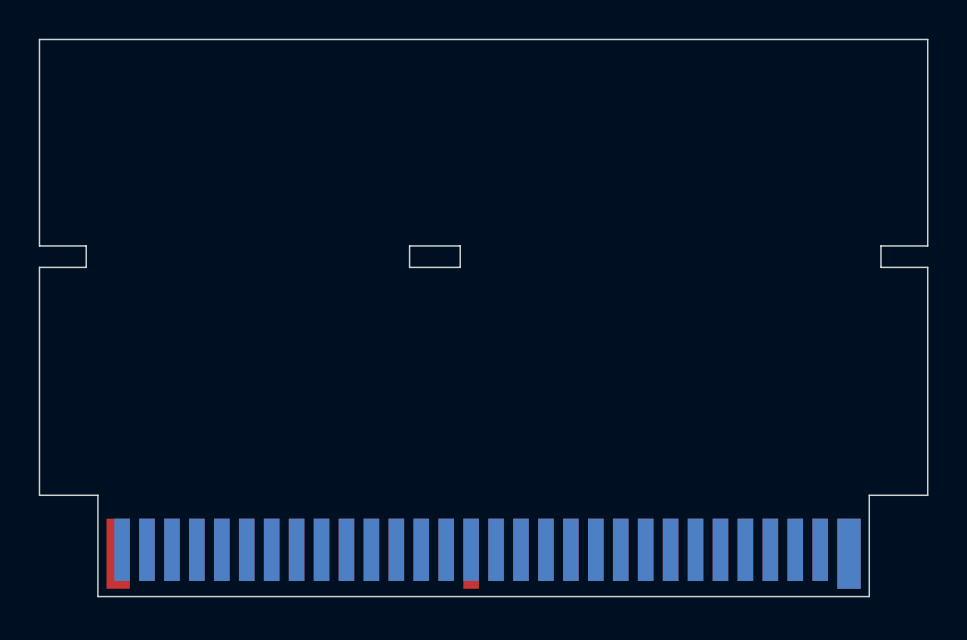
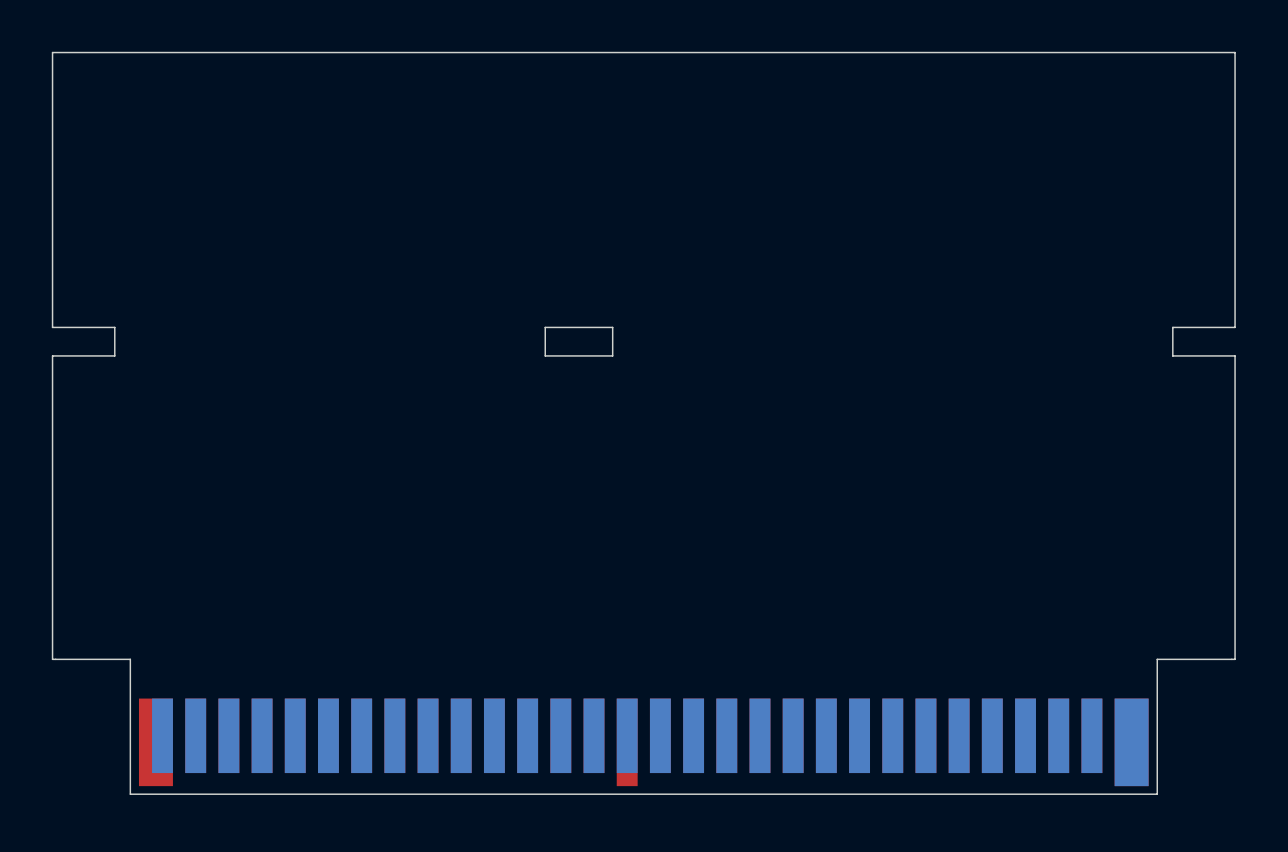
part footprint: [106, 518, 861, 589] -> [138, 698, 1149, 787]

